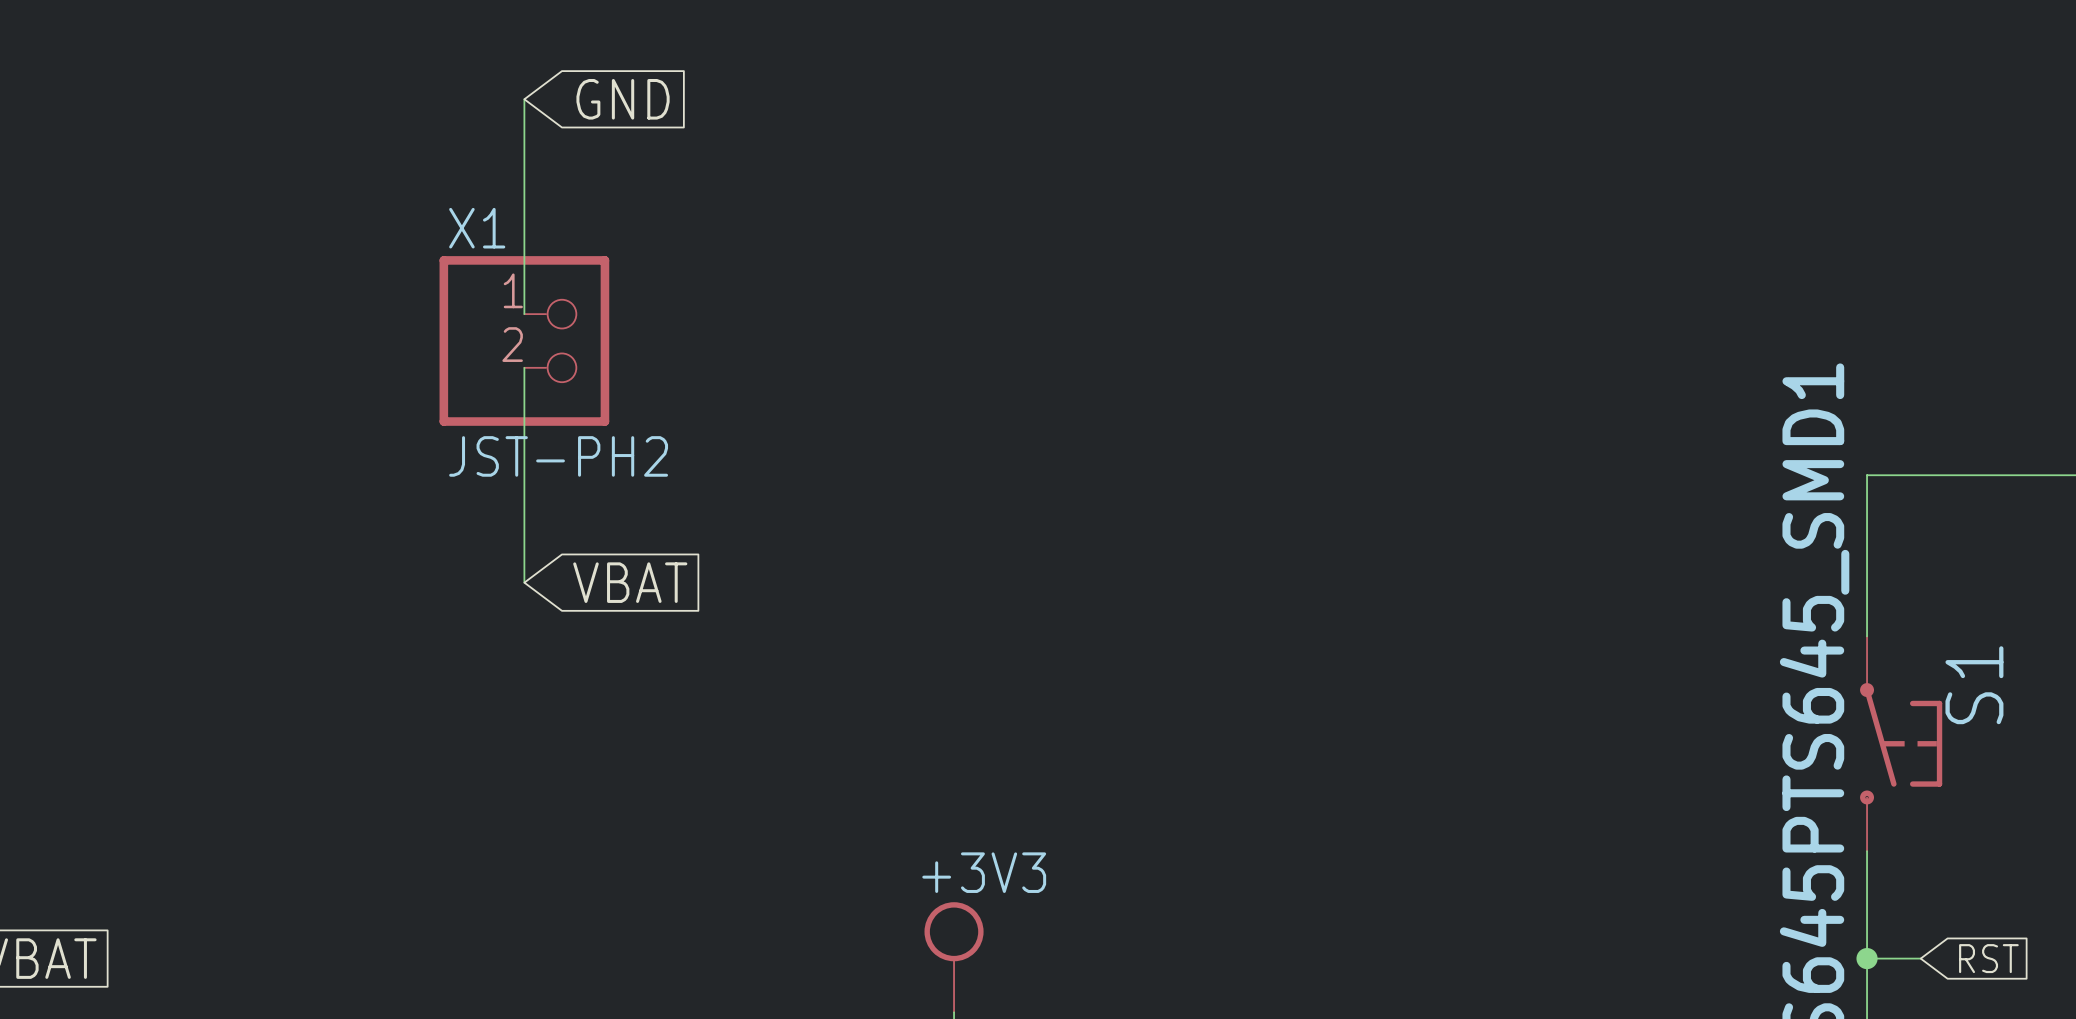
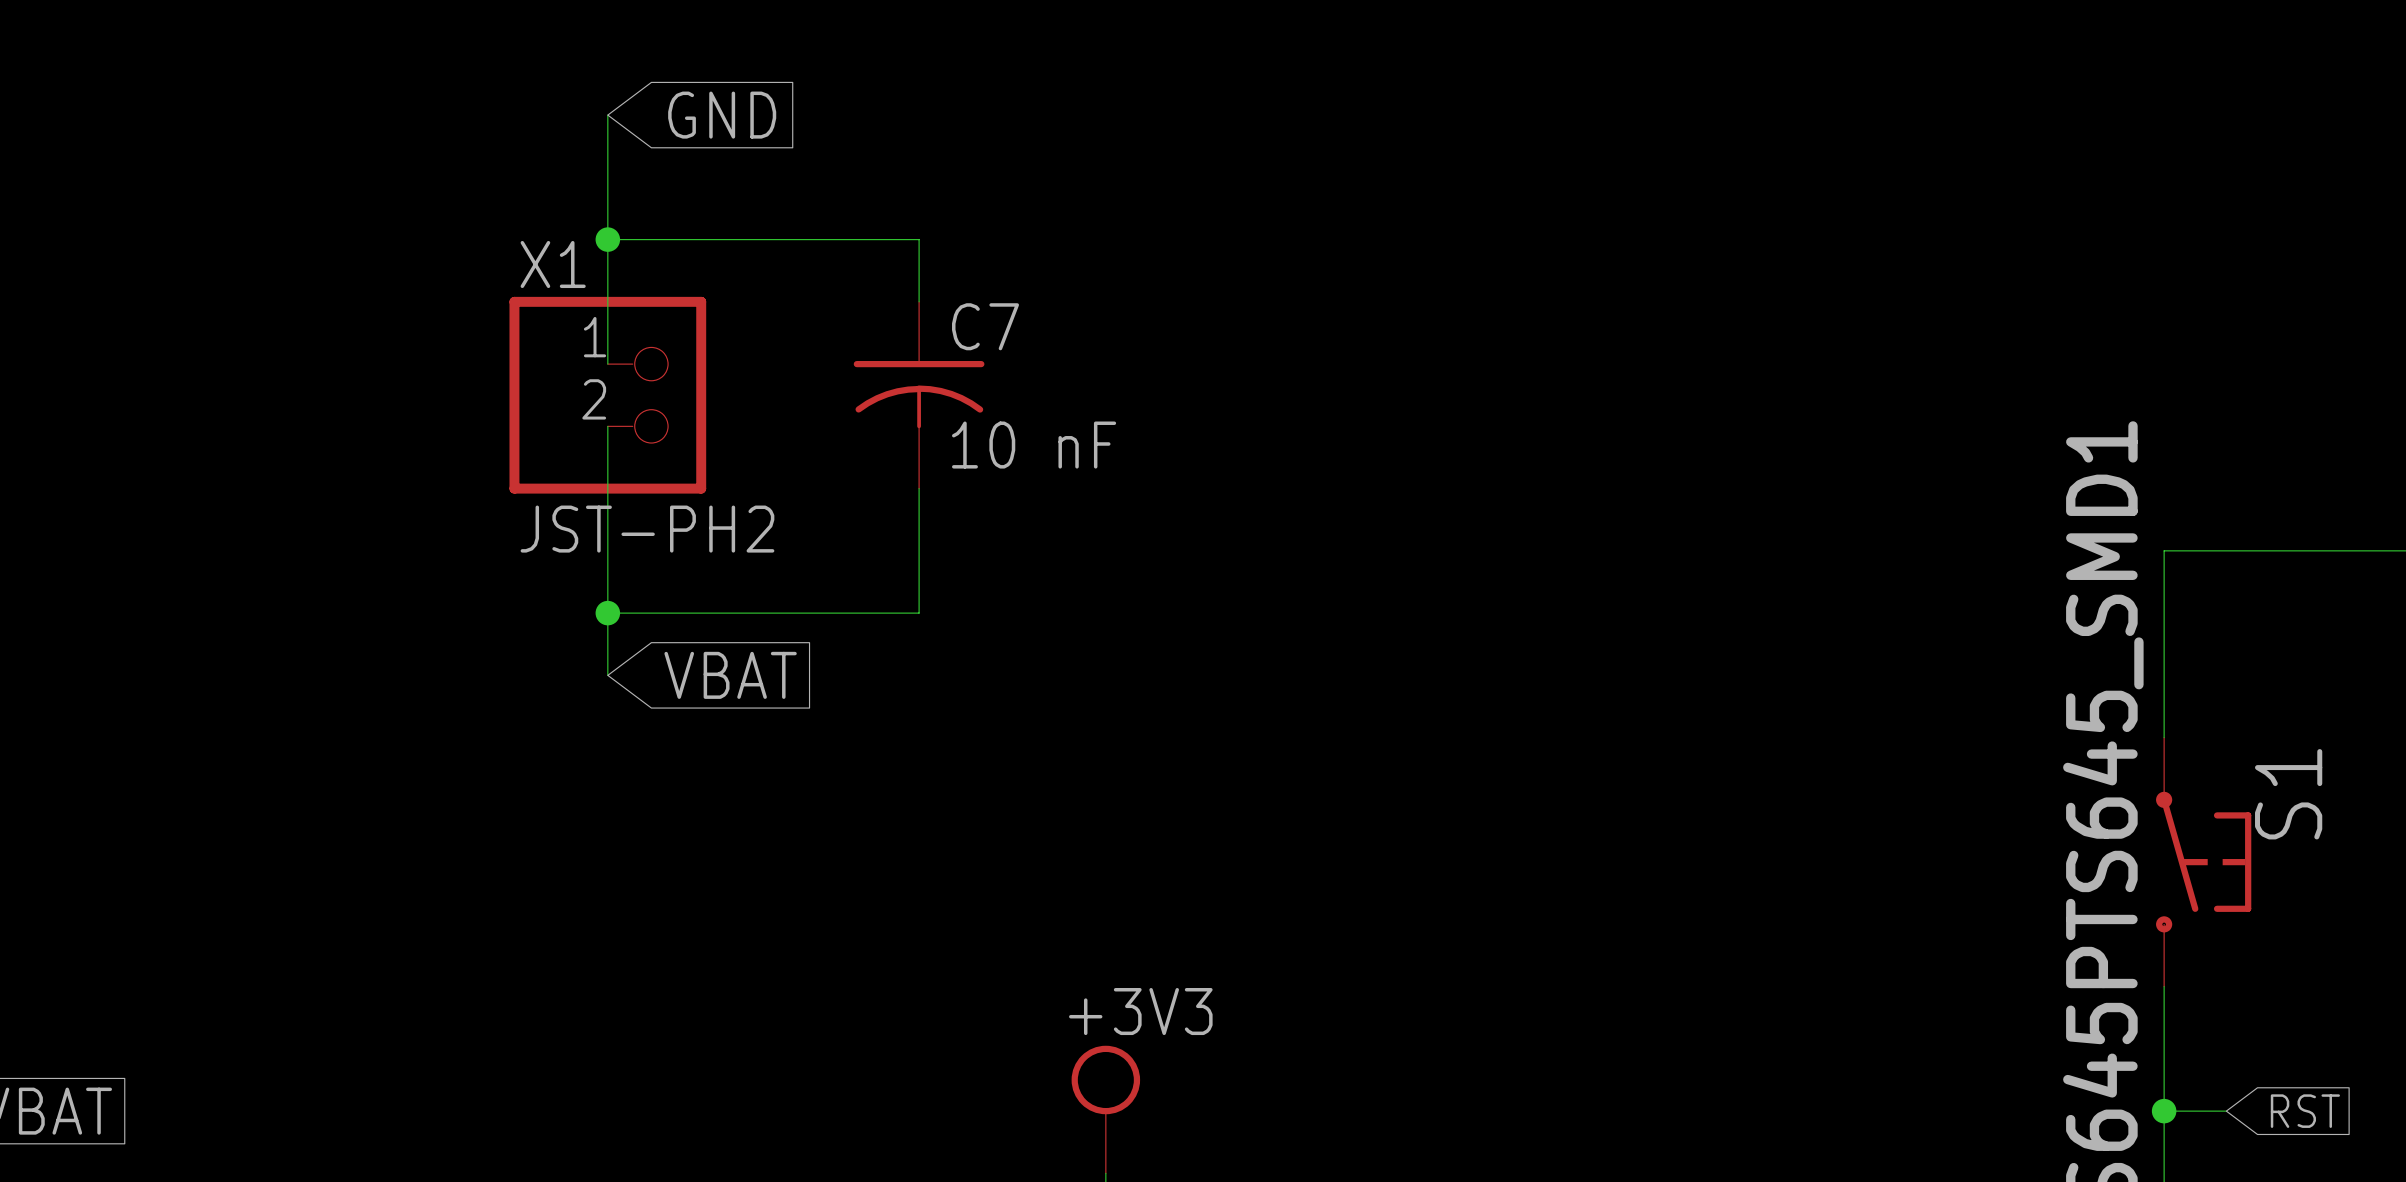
wire: none -> (607, 239) (919, 239) (919, 301)
junction: none -> (607, 239)
C7: none -> 10 nF (919, 395)
wire: none -> (919, 488) (919, 613) (607, 613)
junction: none -> (607, 613)

